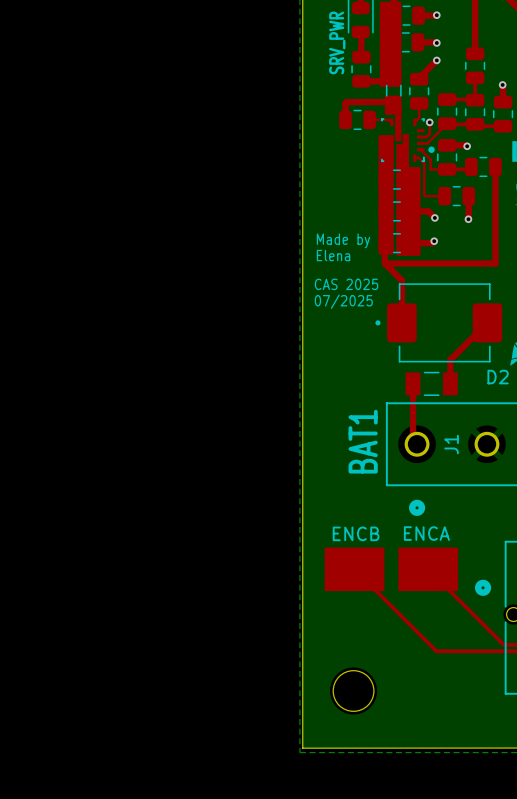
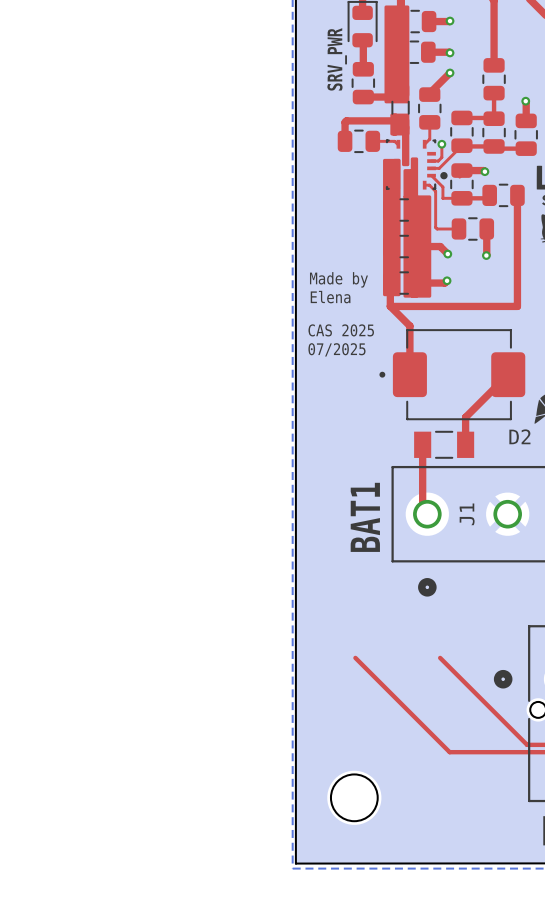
ENCB: (354, 569) -> none
ENCA: (428, 569) -> none

